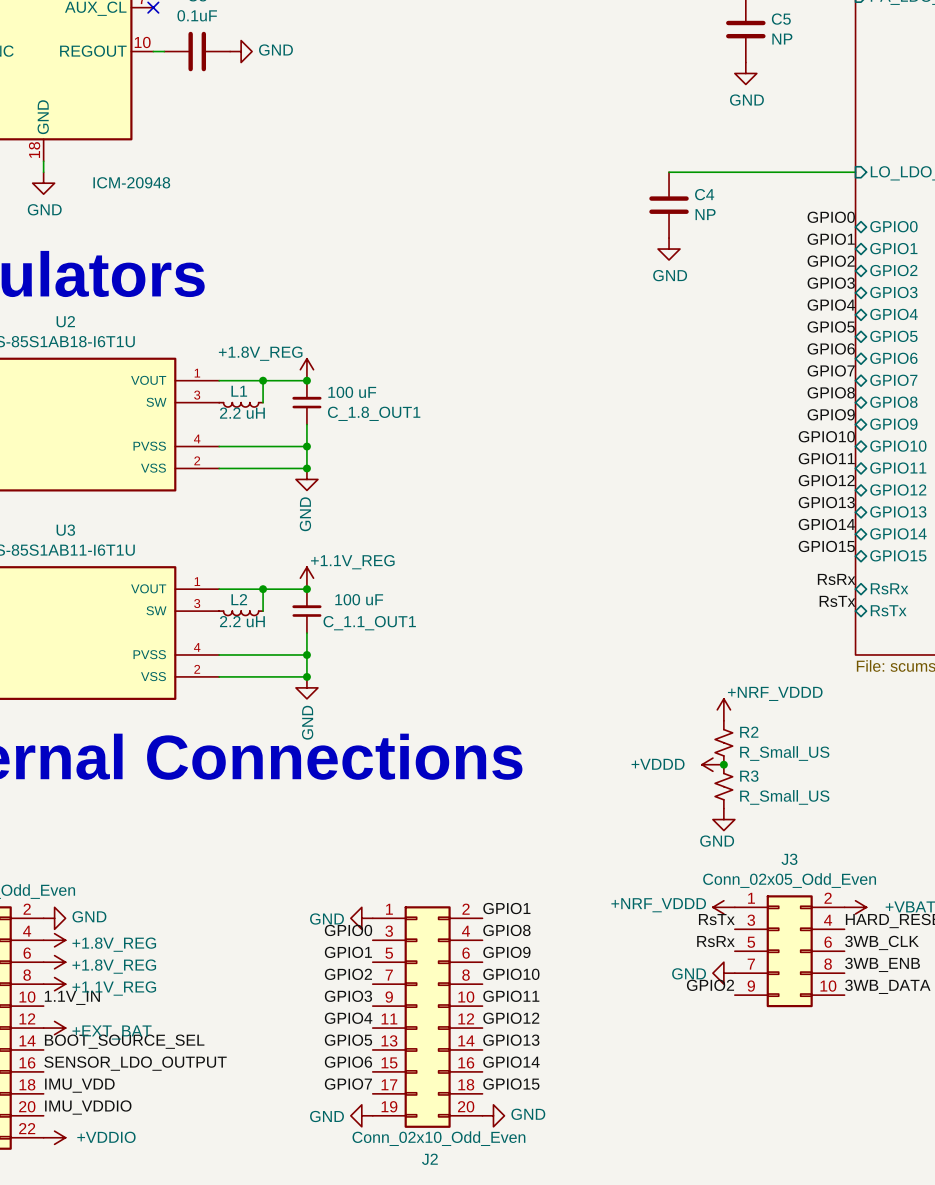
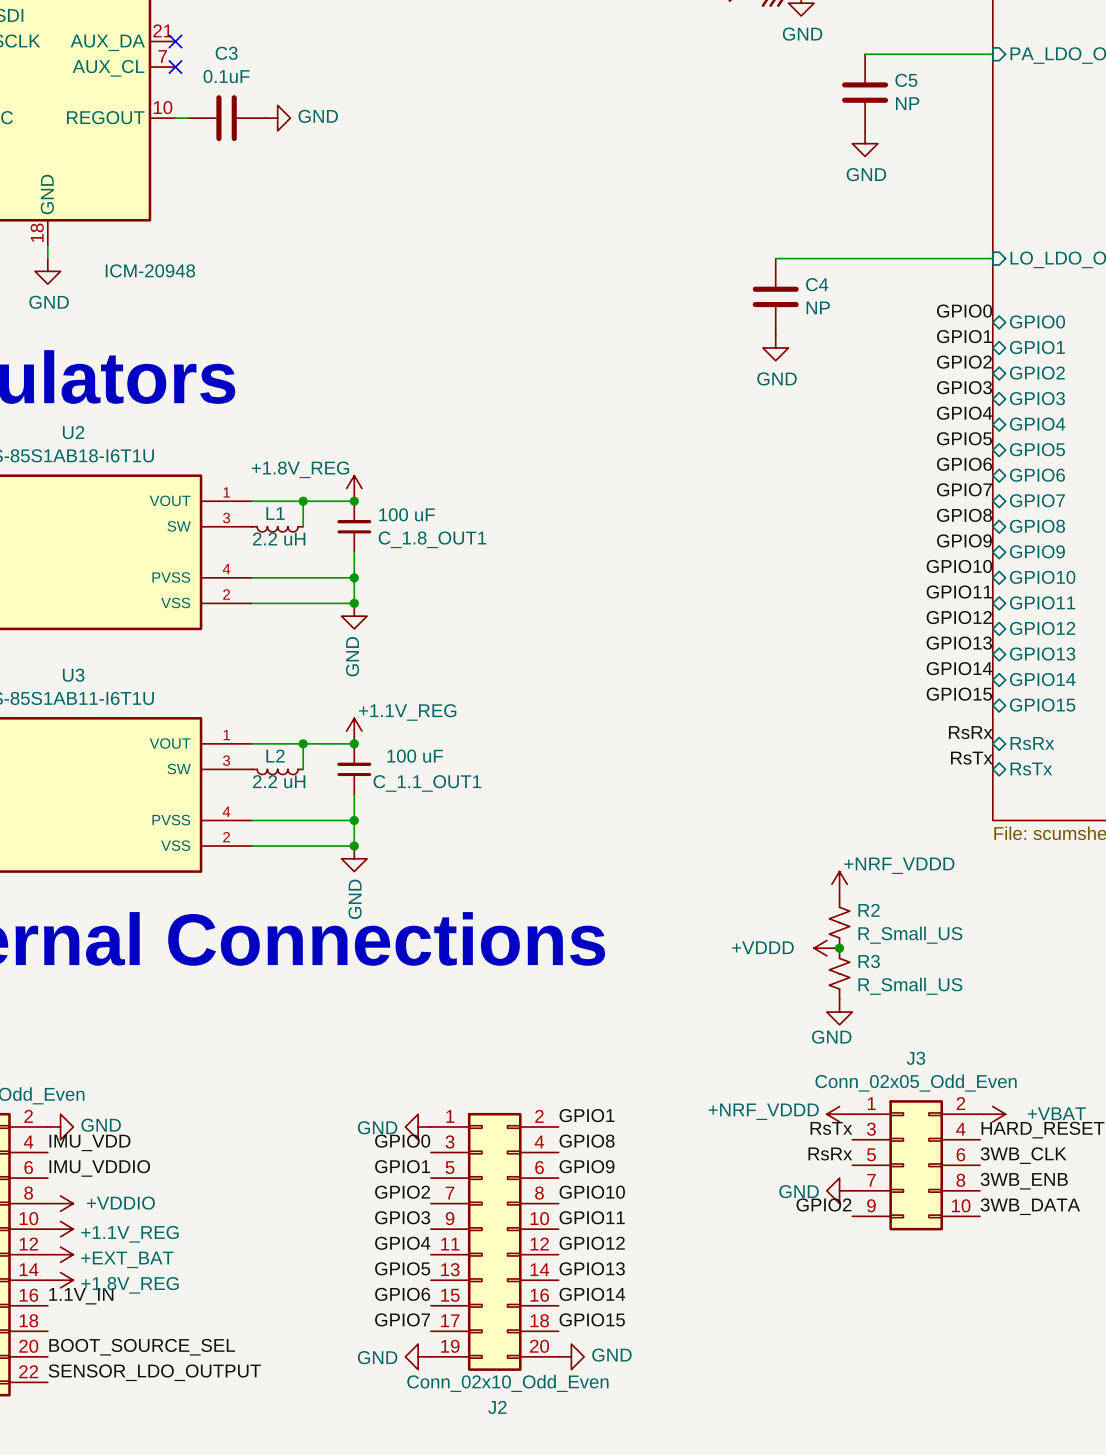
power symbol: +1.8V_REG (54, 940) -> none
label: none -> IMU_VDDIO (99, 1168)
power symbol: +1.8V_REG (54, 962) -> none
power symbol: +1.1V_REG (54, 984) -> +VDDIO (60, 1203)
label: 1.1V_IN (72, 997) -> none
power symbol: none -> +1.1V_REG (60, 1229)
label: BOOT_SOURCE_SEL (124, 1041) -> none
power symbol: none -> +1.8V_REG (60, 1280)
label: SENSOR_LDO_OUTPUT (135, 1063) -> 1.1V_IN (81, 1296)
label position: IMU_VDD (79, 1085) -> IMU_VDD (89, 1142)
label: IMU_VDDIO (88, 1107) -> BOOT_SOURCE_SEL (142, 1347)
label: none -> SENSOR_LDO_OUTPUT (154, 1372)
power symbol: +VDDIO (54, 1137) -> none

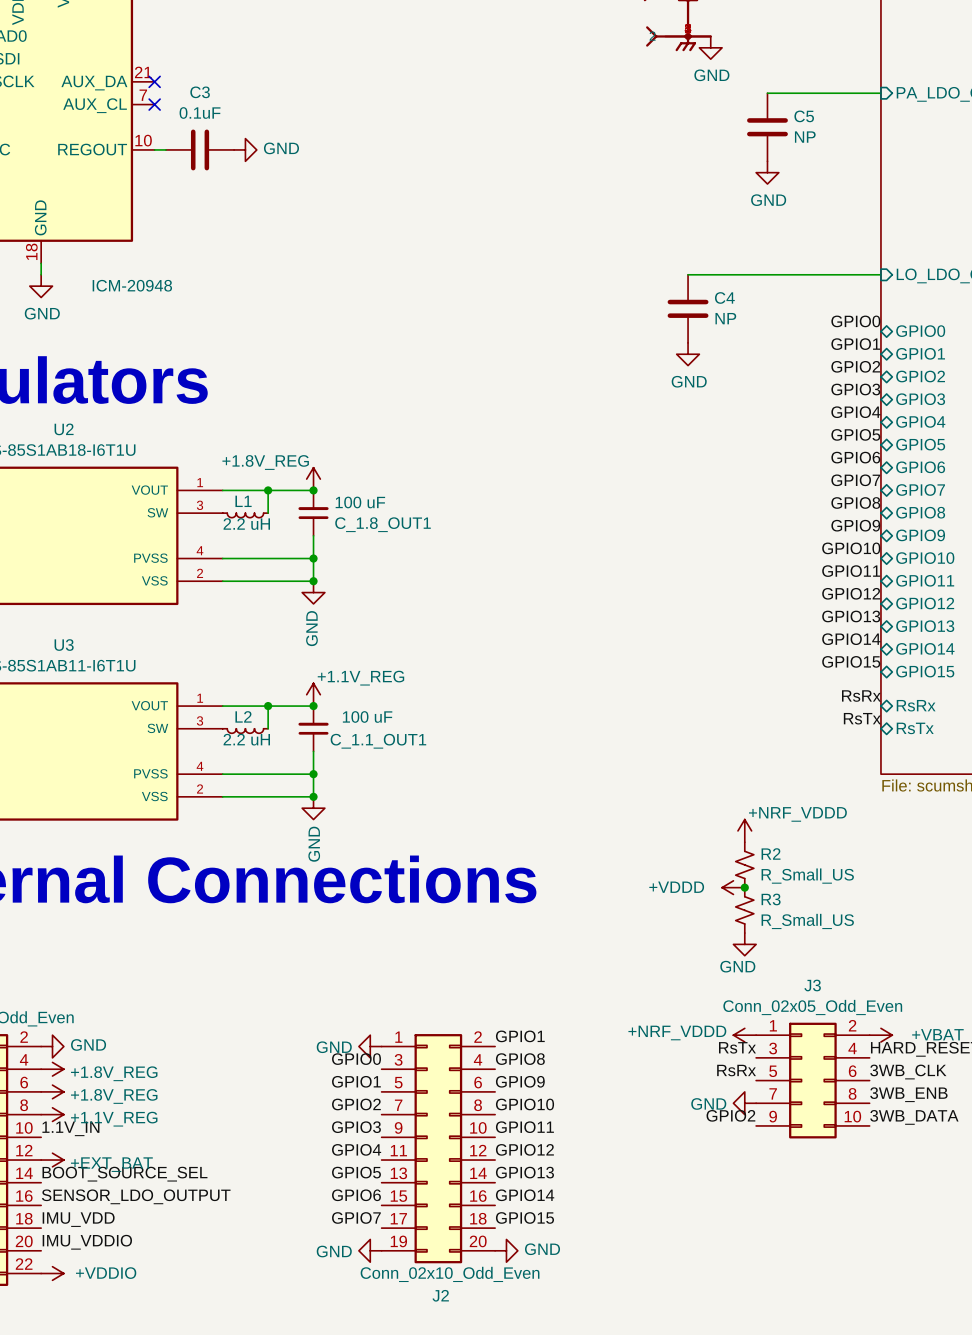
label position: IMU_VDD (89, 1142) -> IMU_VDD (78, 1219)
power symbol: none -> +1.8V_REG (52, 1069)
label: IMU_VDDIO (99, 1168) -> none
power symbol: none -> +1.8V_REG (52, 1091)
power symbol: +VDDIO (60, 1203) -> +1.1V_REG (52, 1114)
label: none -> 1.1V_IN (70, 1128)
power symbol: +1.1V_REG (60, 1229) -> none
label: none -> BOOT_SOURCE_SEL (124, 1174)
power symbol: +1.8V_REG (60, 1280) -> none
label: 1.1V_IN (81, 1296) -> SENSOR_LDO_OUTPUT (136, 1196)
label: BOOT_SOURCE_SEL (142, 1347) -> IMU_VDDIO (87, 1242)
label: SENSOR_LDO_OUTPUT (154, 1372) -> none
power symbol: none -> +VDDIO (52, 1273)

